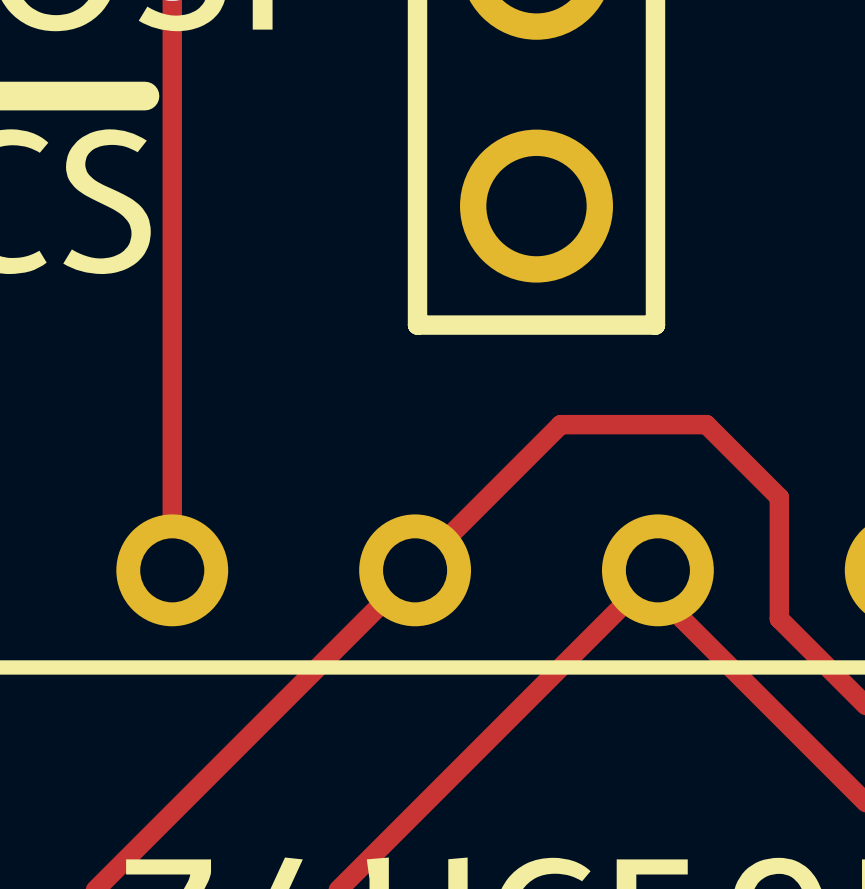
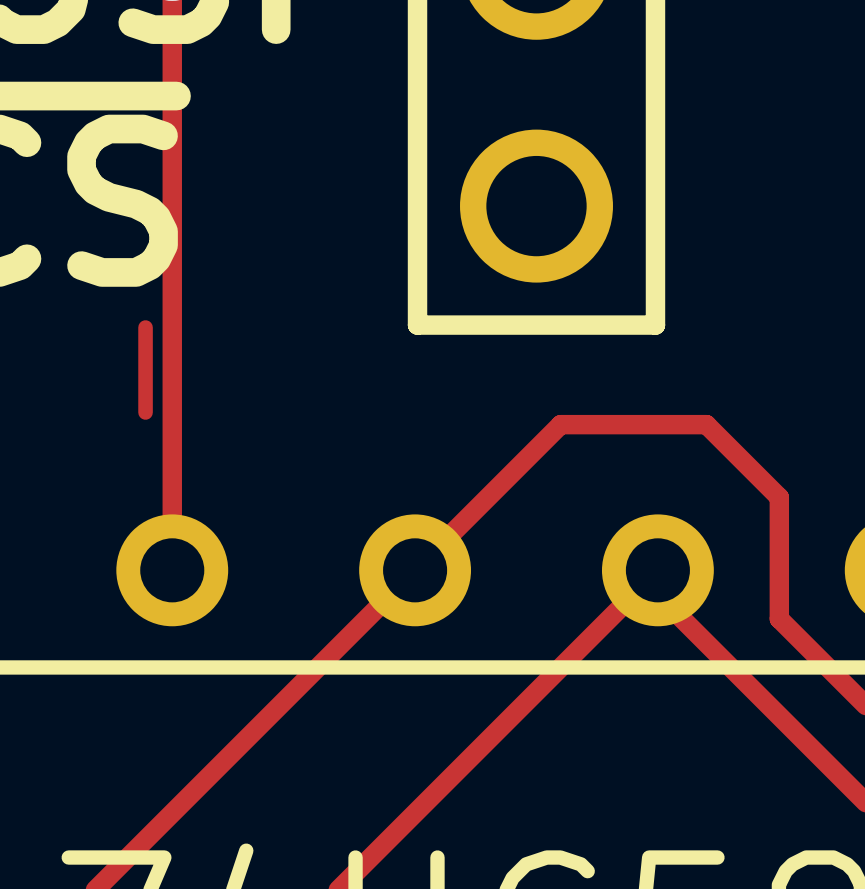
track: none -> (145, 327) (145, 412)

